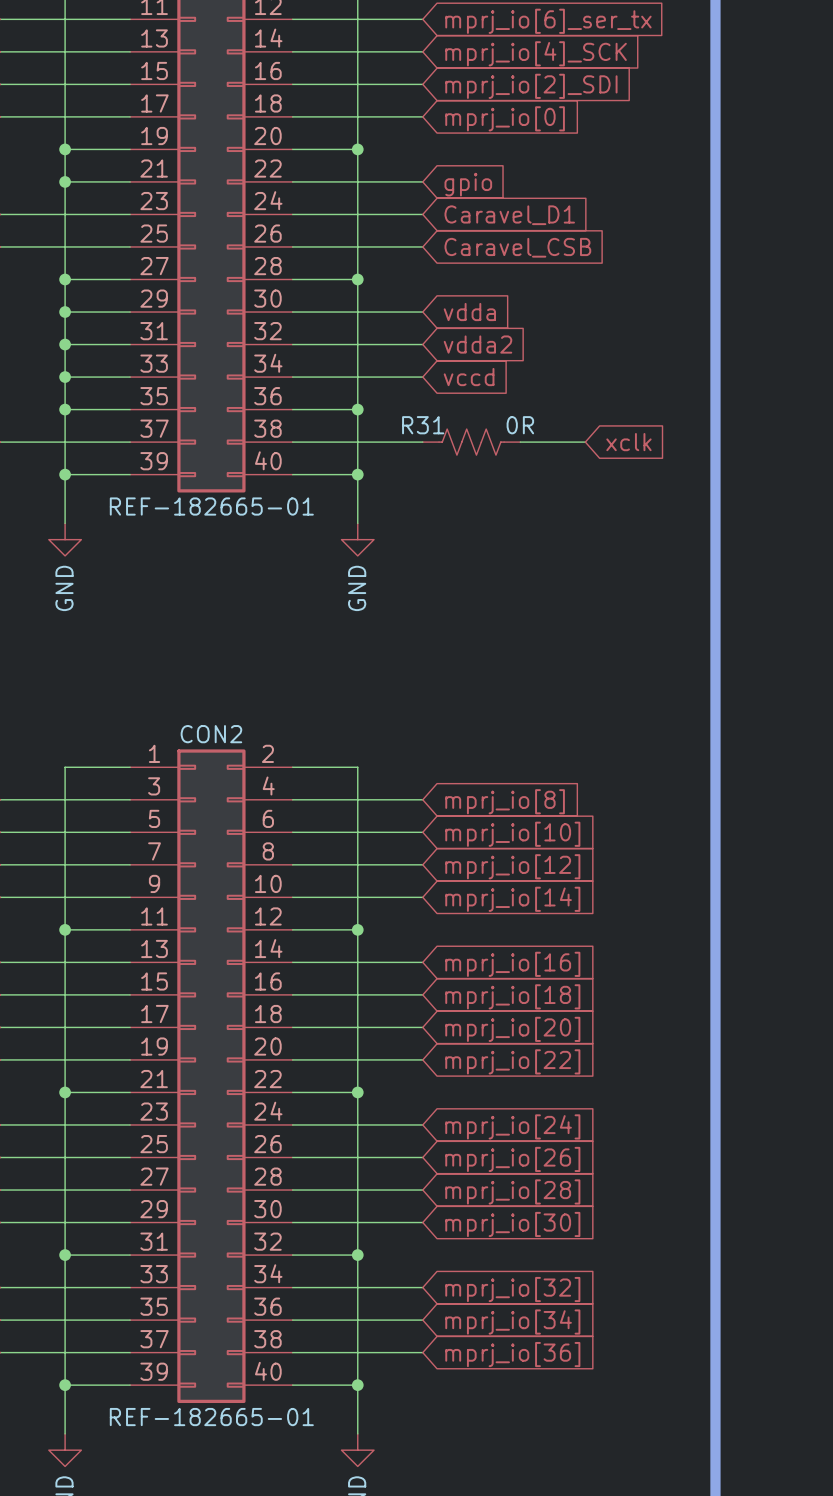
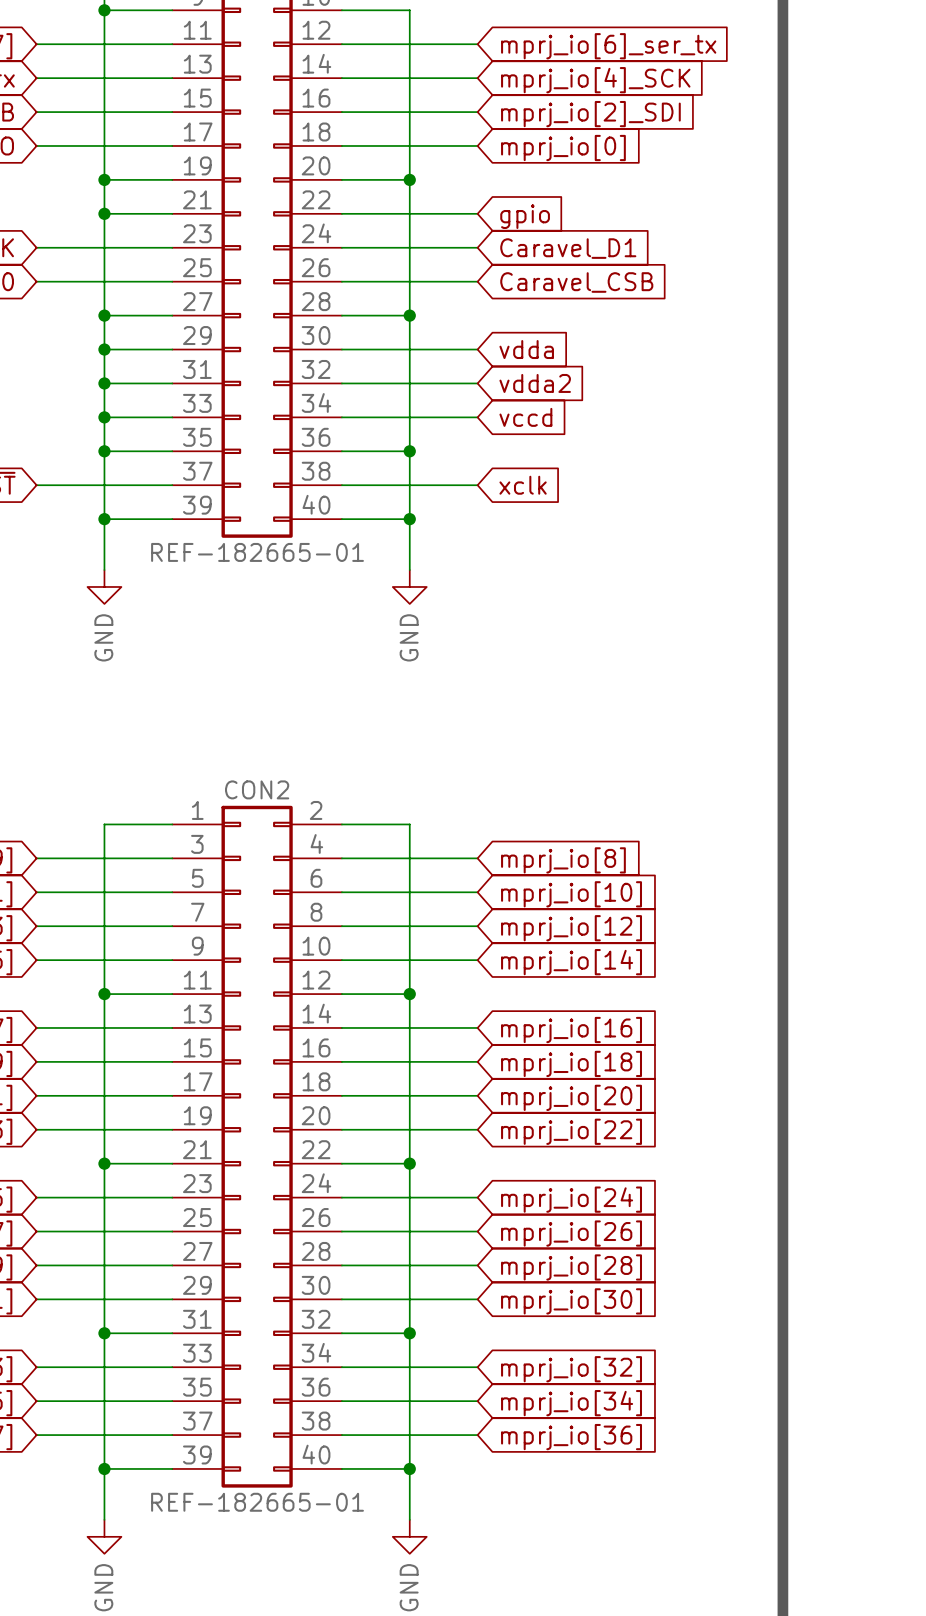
R31: (471, 442) -> none
wire: (520, 442) (585, 442) -> none
global label position: xclk (628, 442) -> xclk (523, 485)

